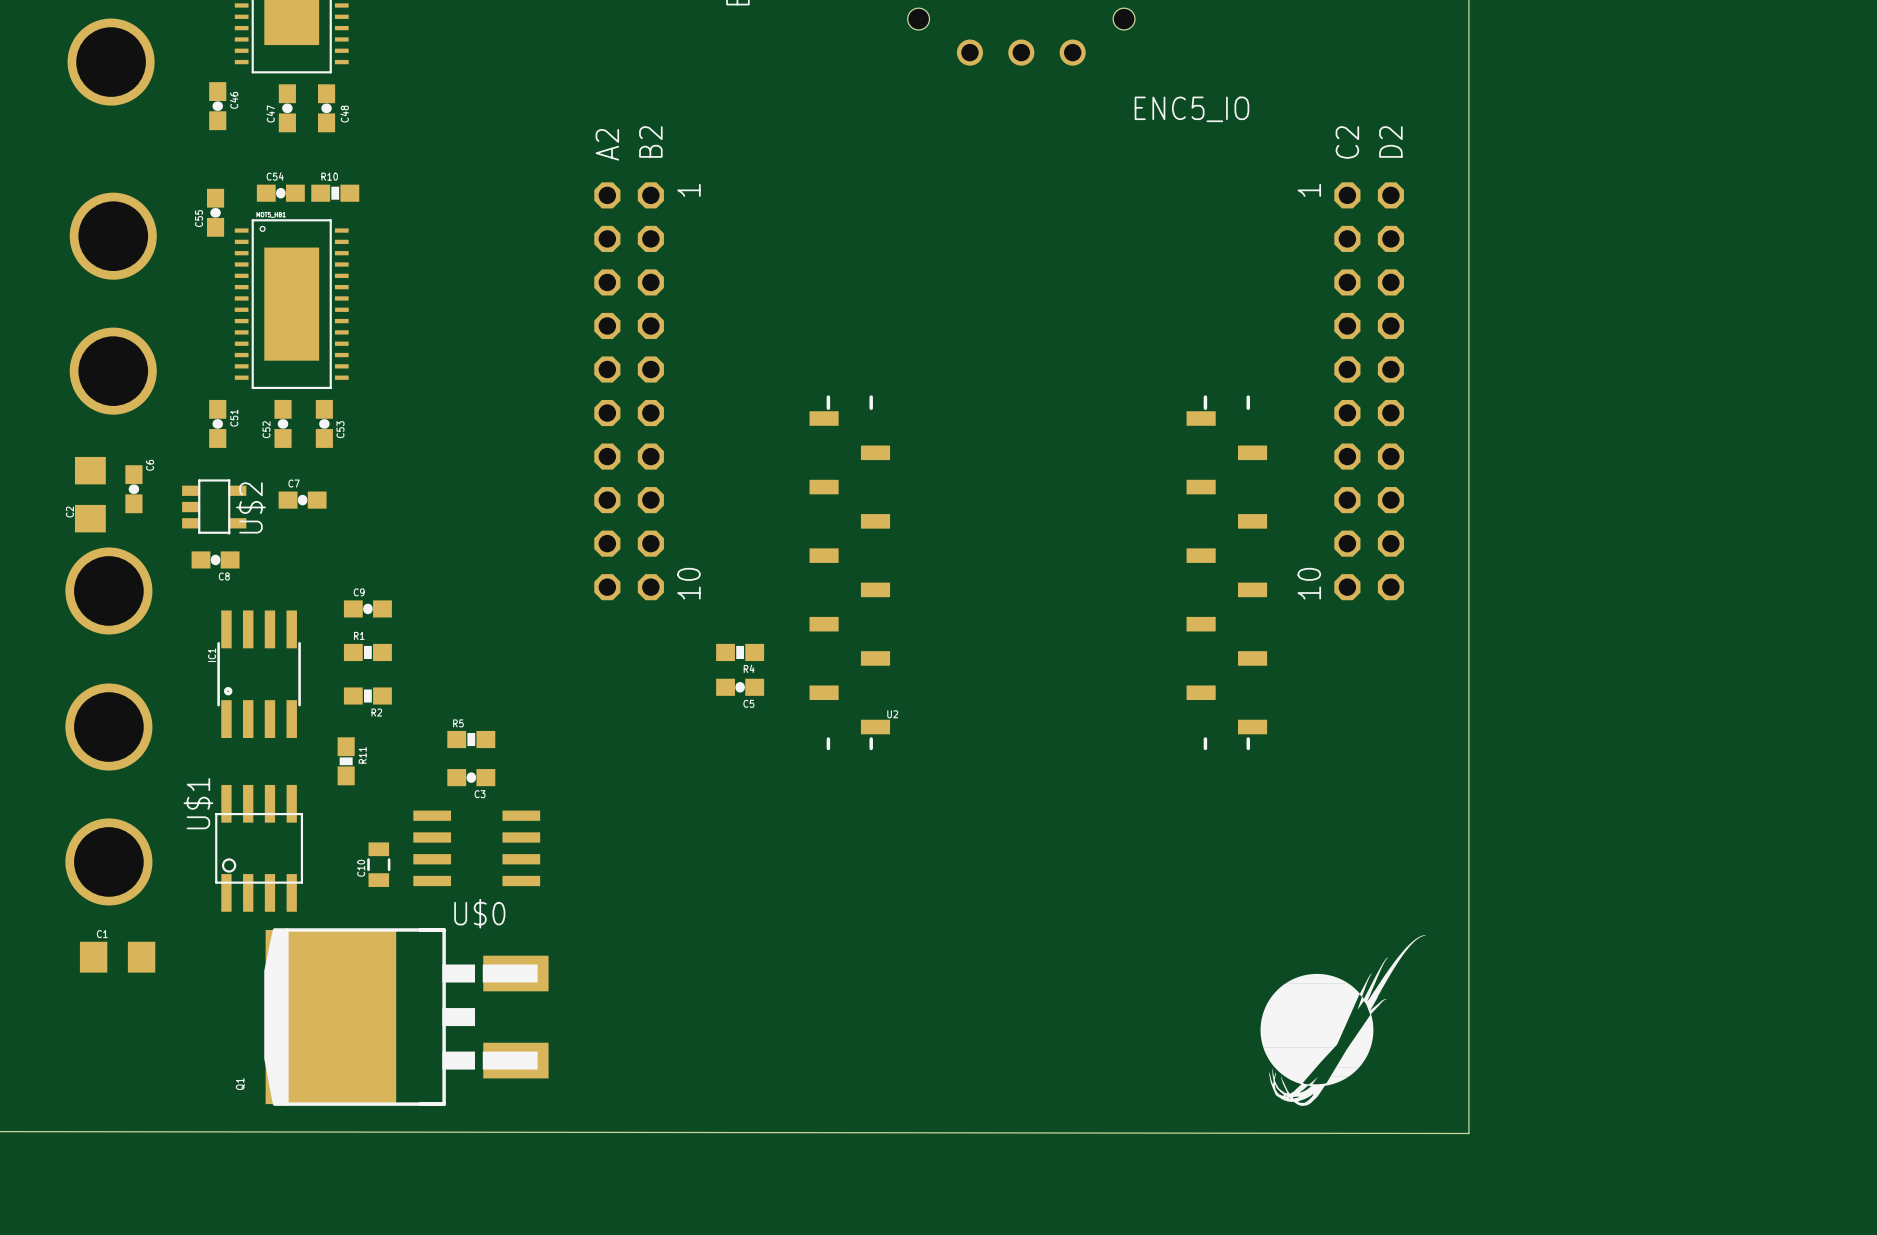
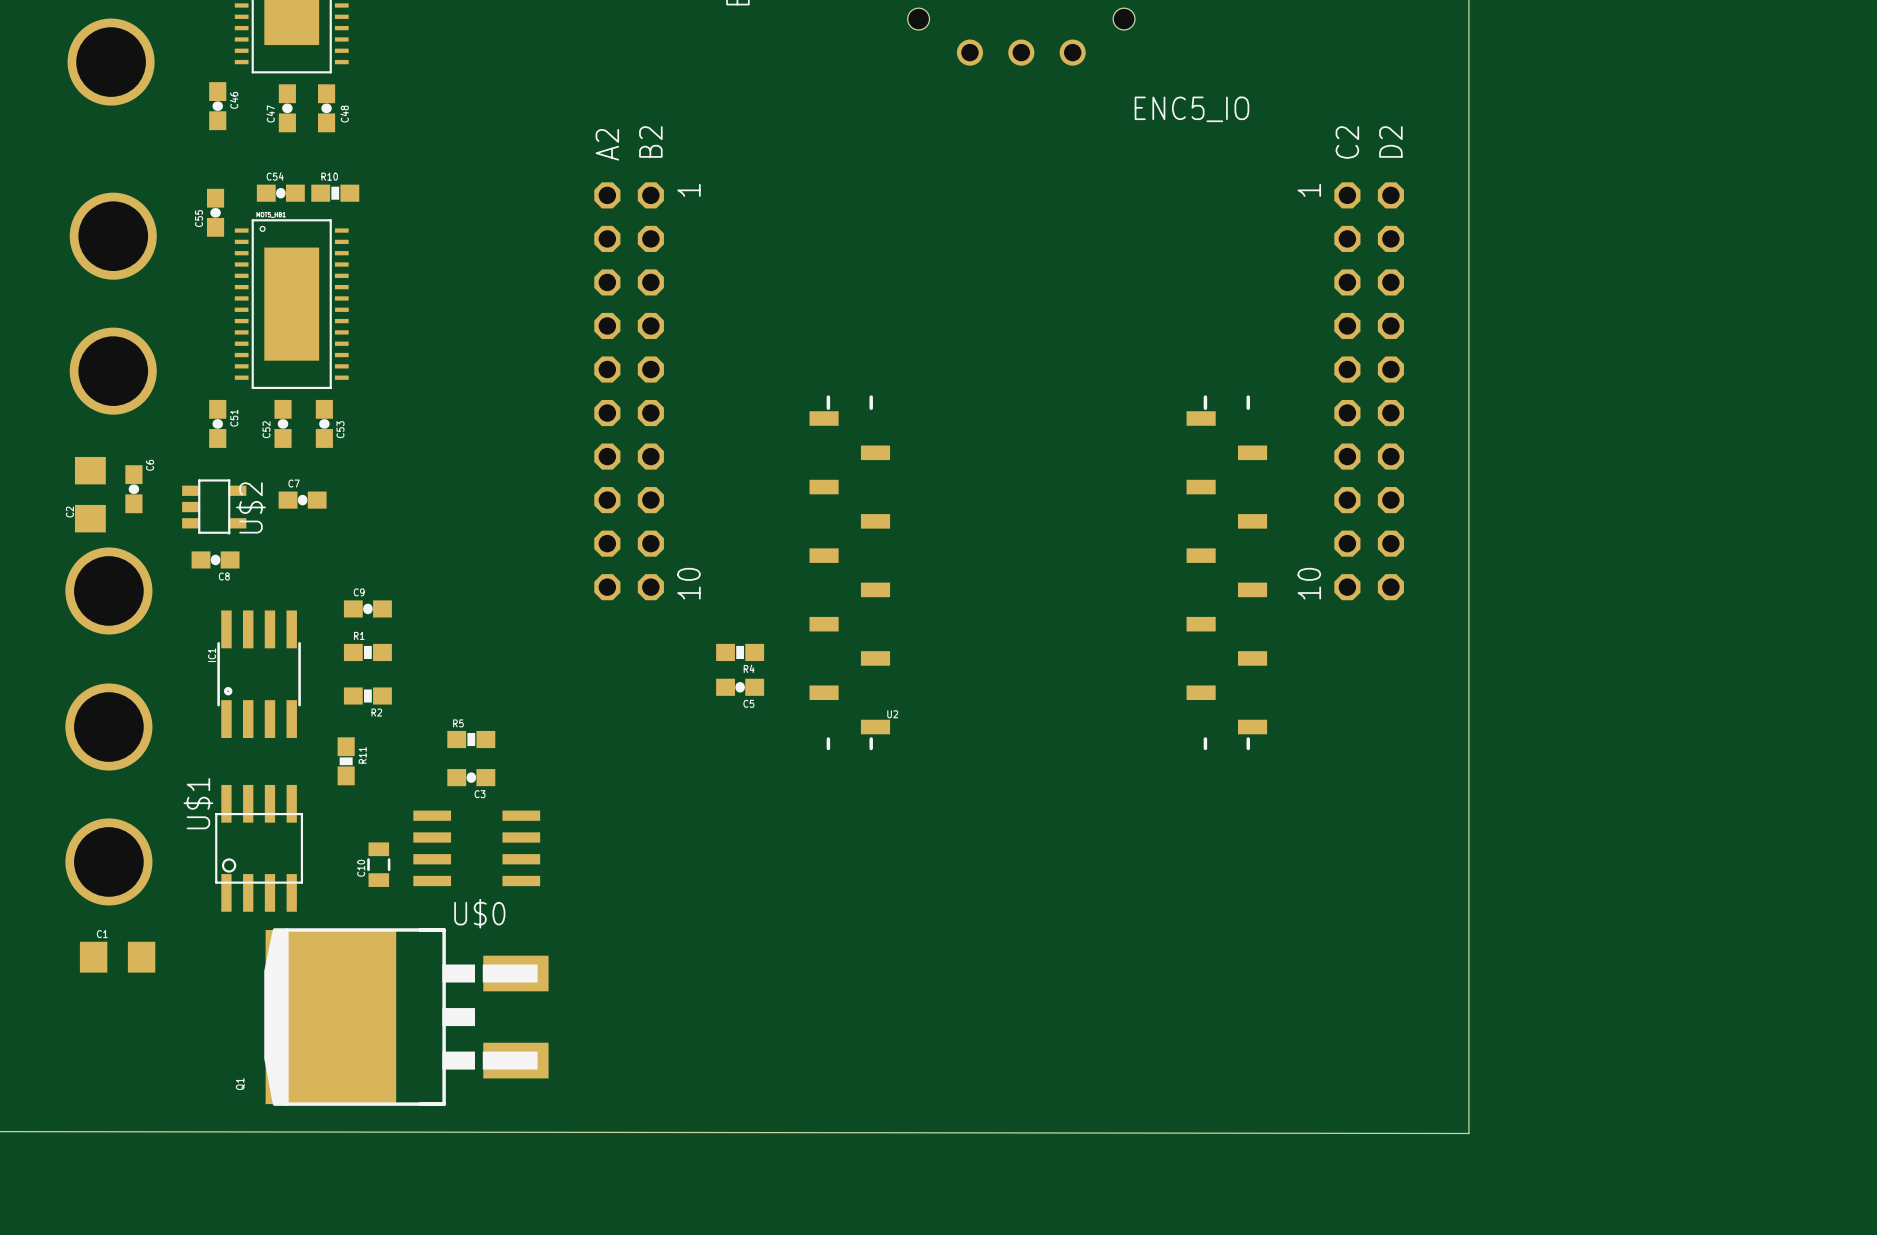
drawing: [1260, 935, 1427, 1107] -> none

